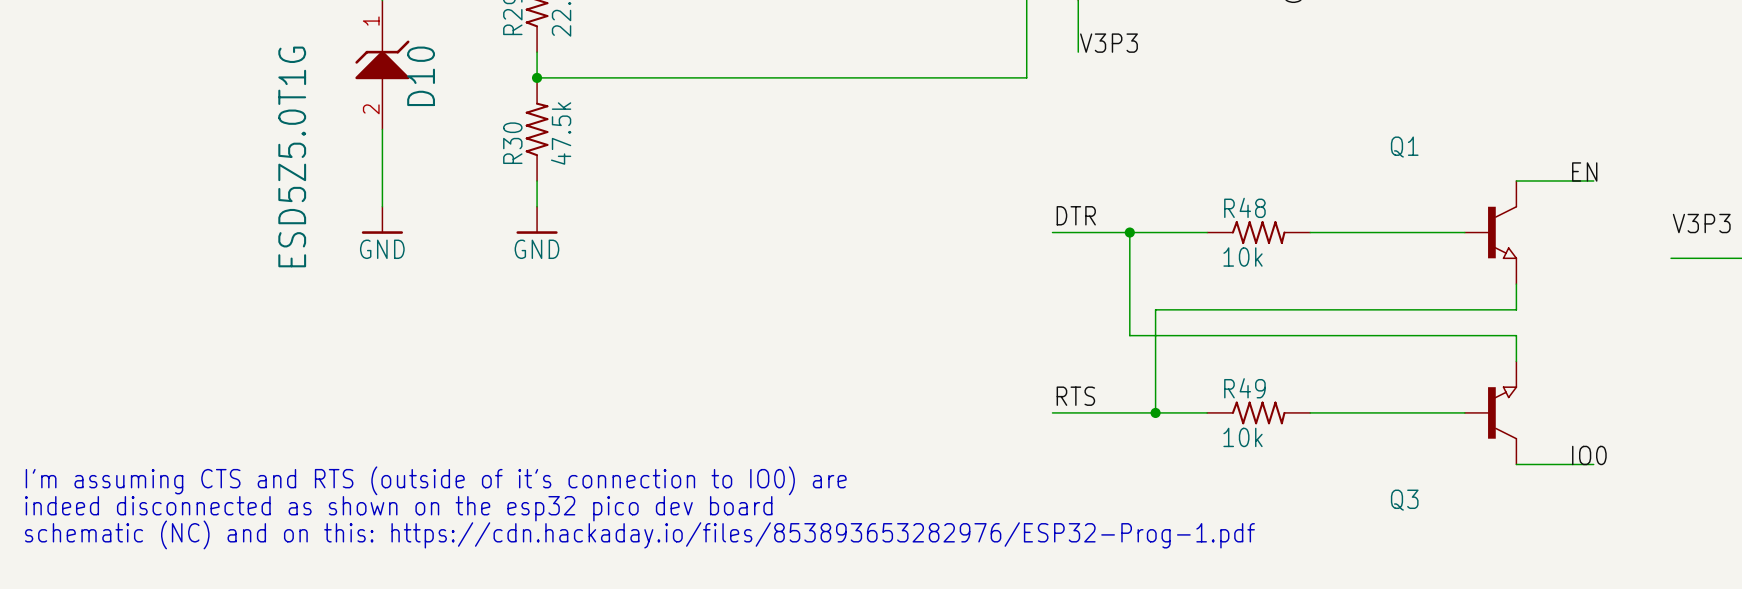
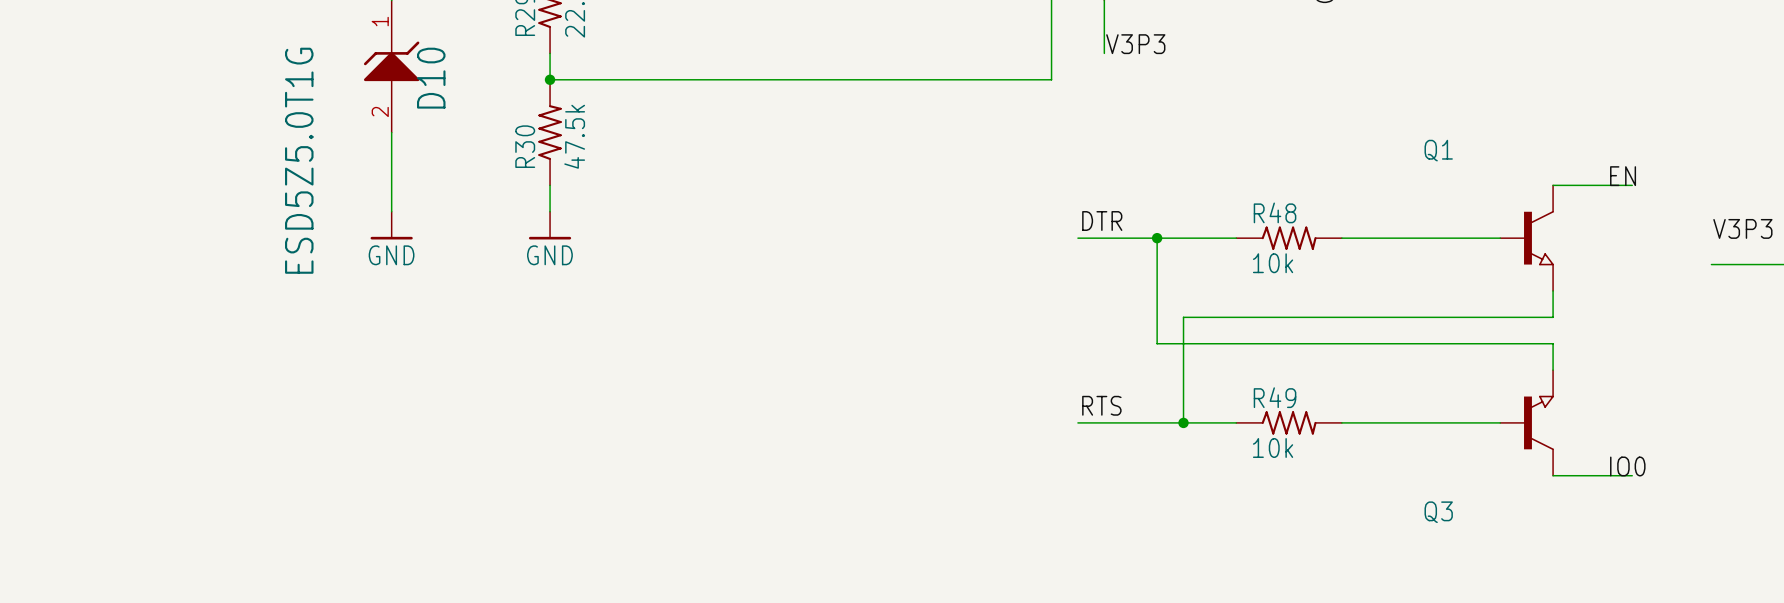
text: I'm assuming CTS and RTS (outside of it's connection to IO0) are (436, 480) -> none
text: indeed disconnected as shown on the esp32 pico dev board (398, 508) -> none
text: schematic (NC) and on this: https://cdn.hackaday.io/files/853893653282976/ESP32-Prog-1.pdf (639, 534) -> none

